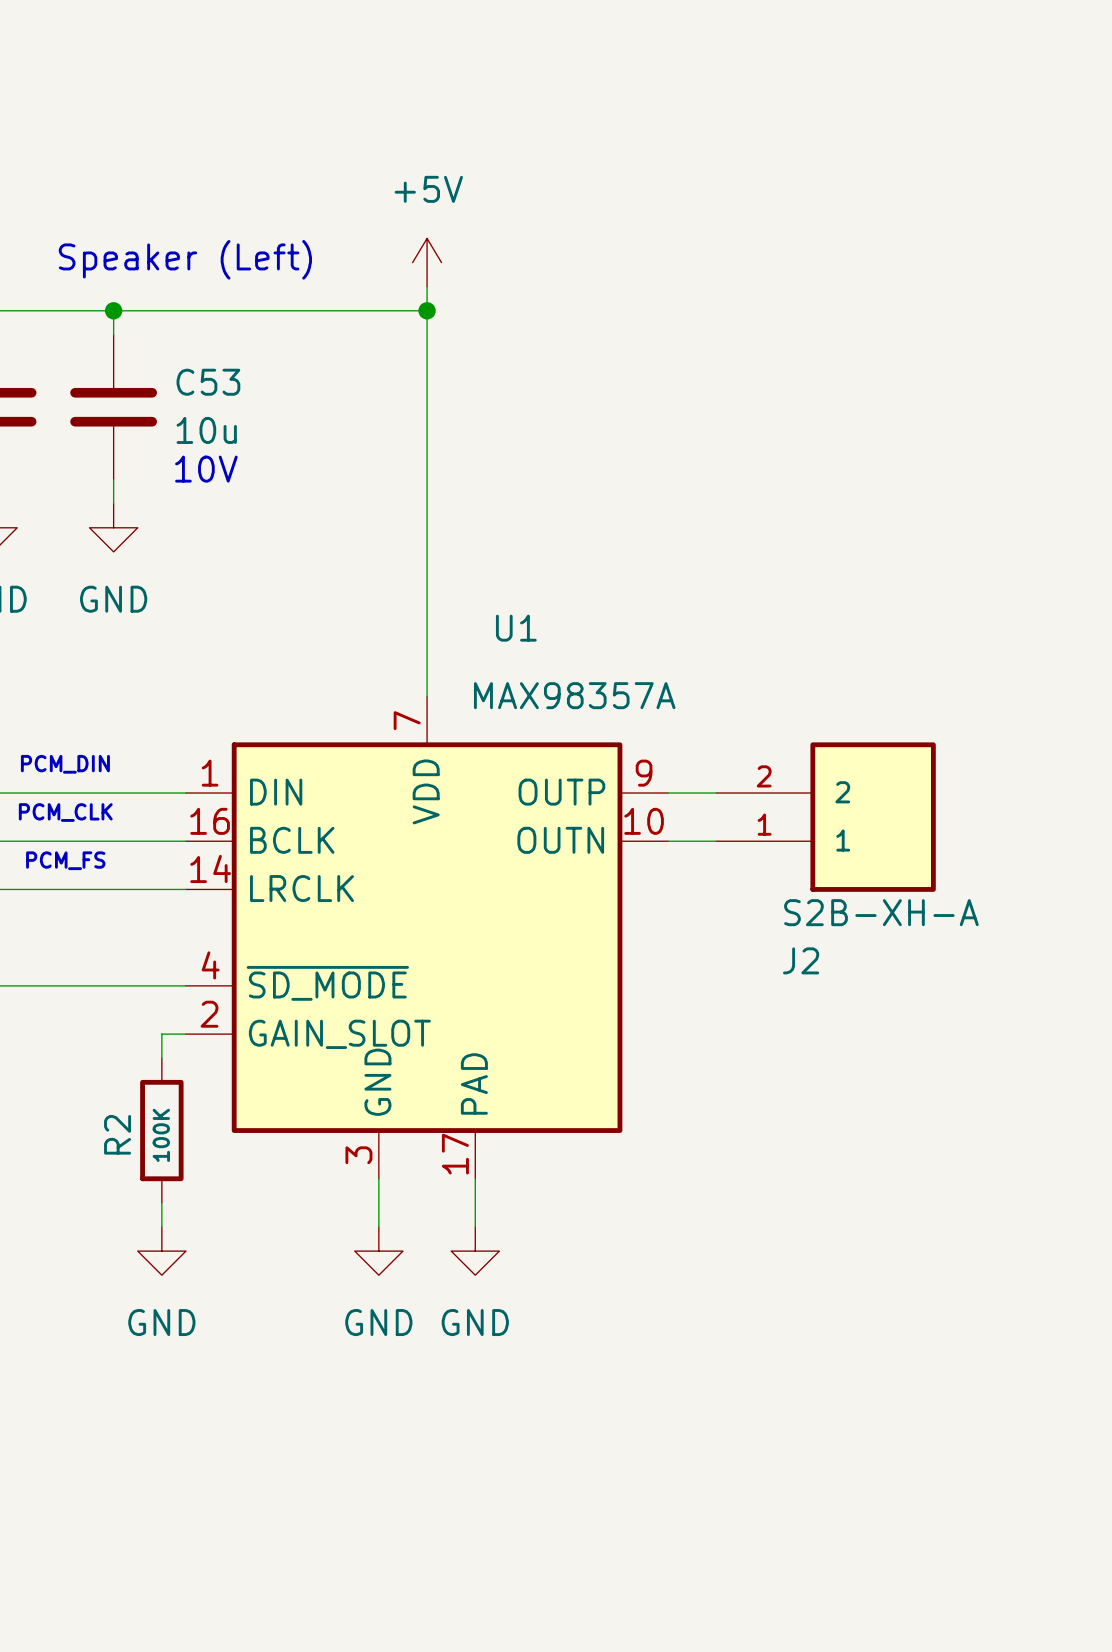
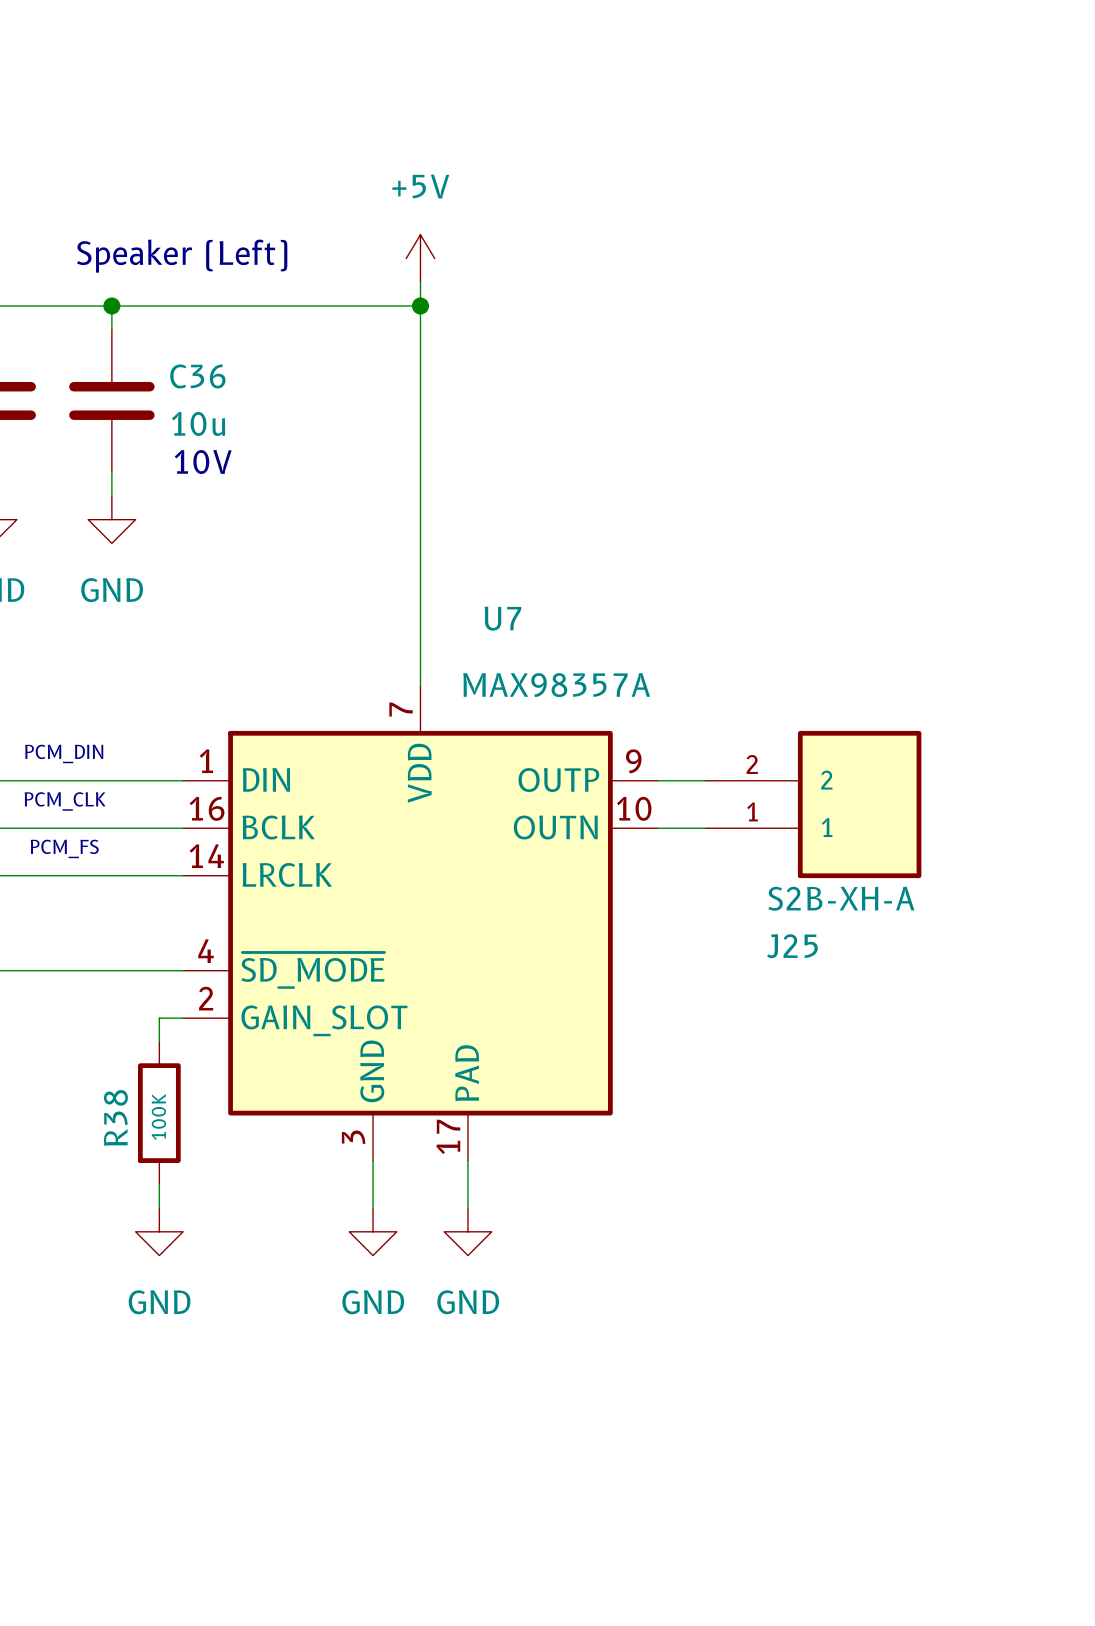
C53 name: C53 (208, 382) -> C36 (197, 376)
U1 name: U1 (516, 628) -> U7 (502, 618)
J2 name: J2 (801, 960) -> J25 (792, 946)
R2 name: R2 (117, 1134) -> R38 (115, 1117)

